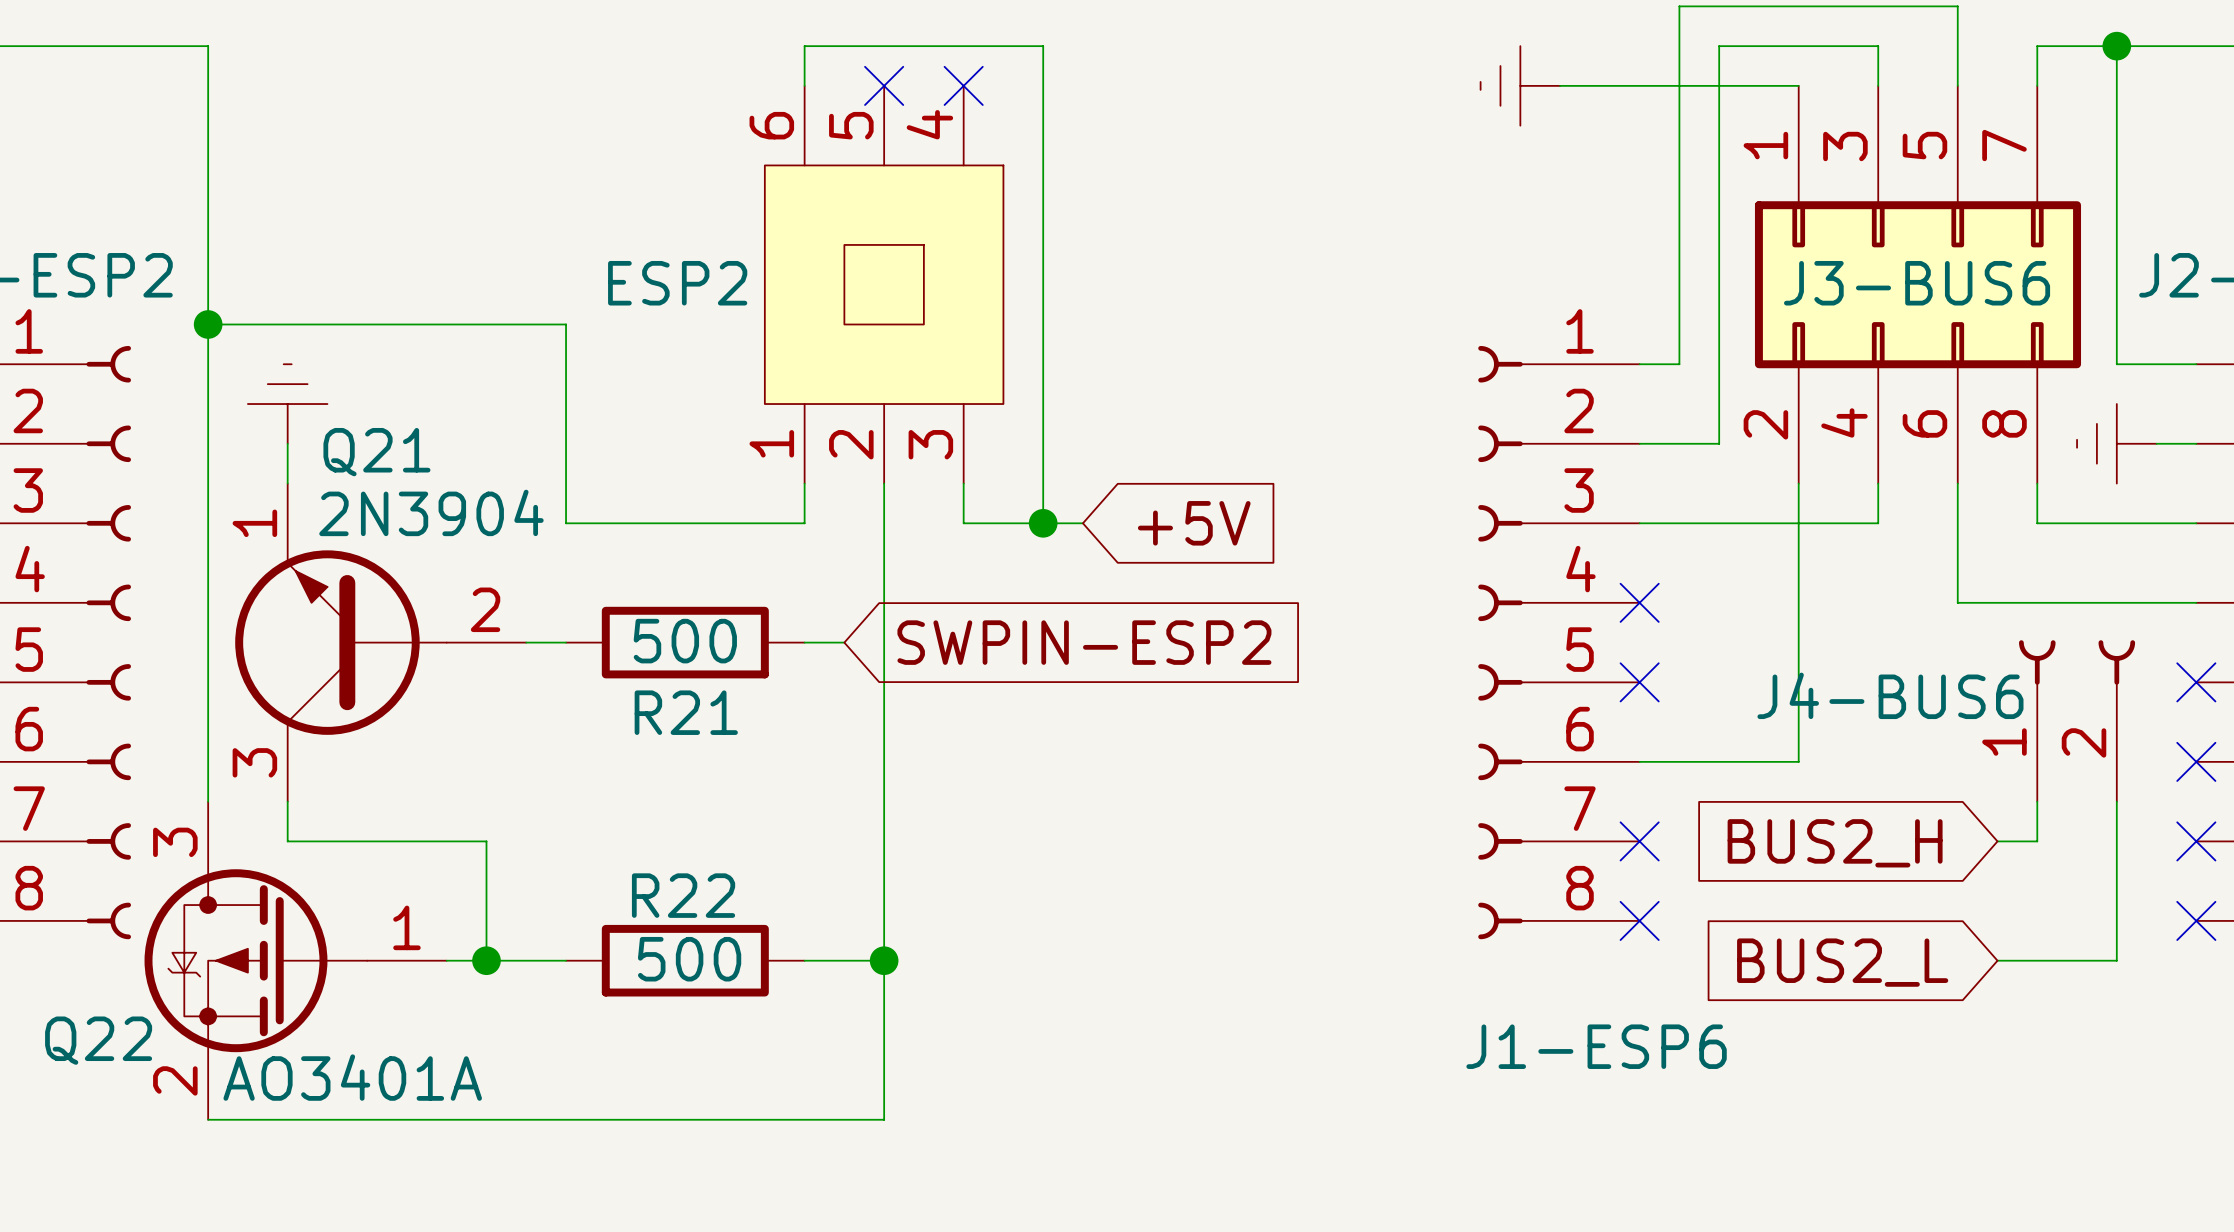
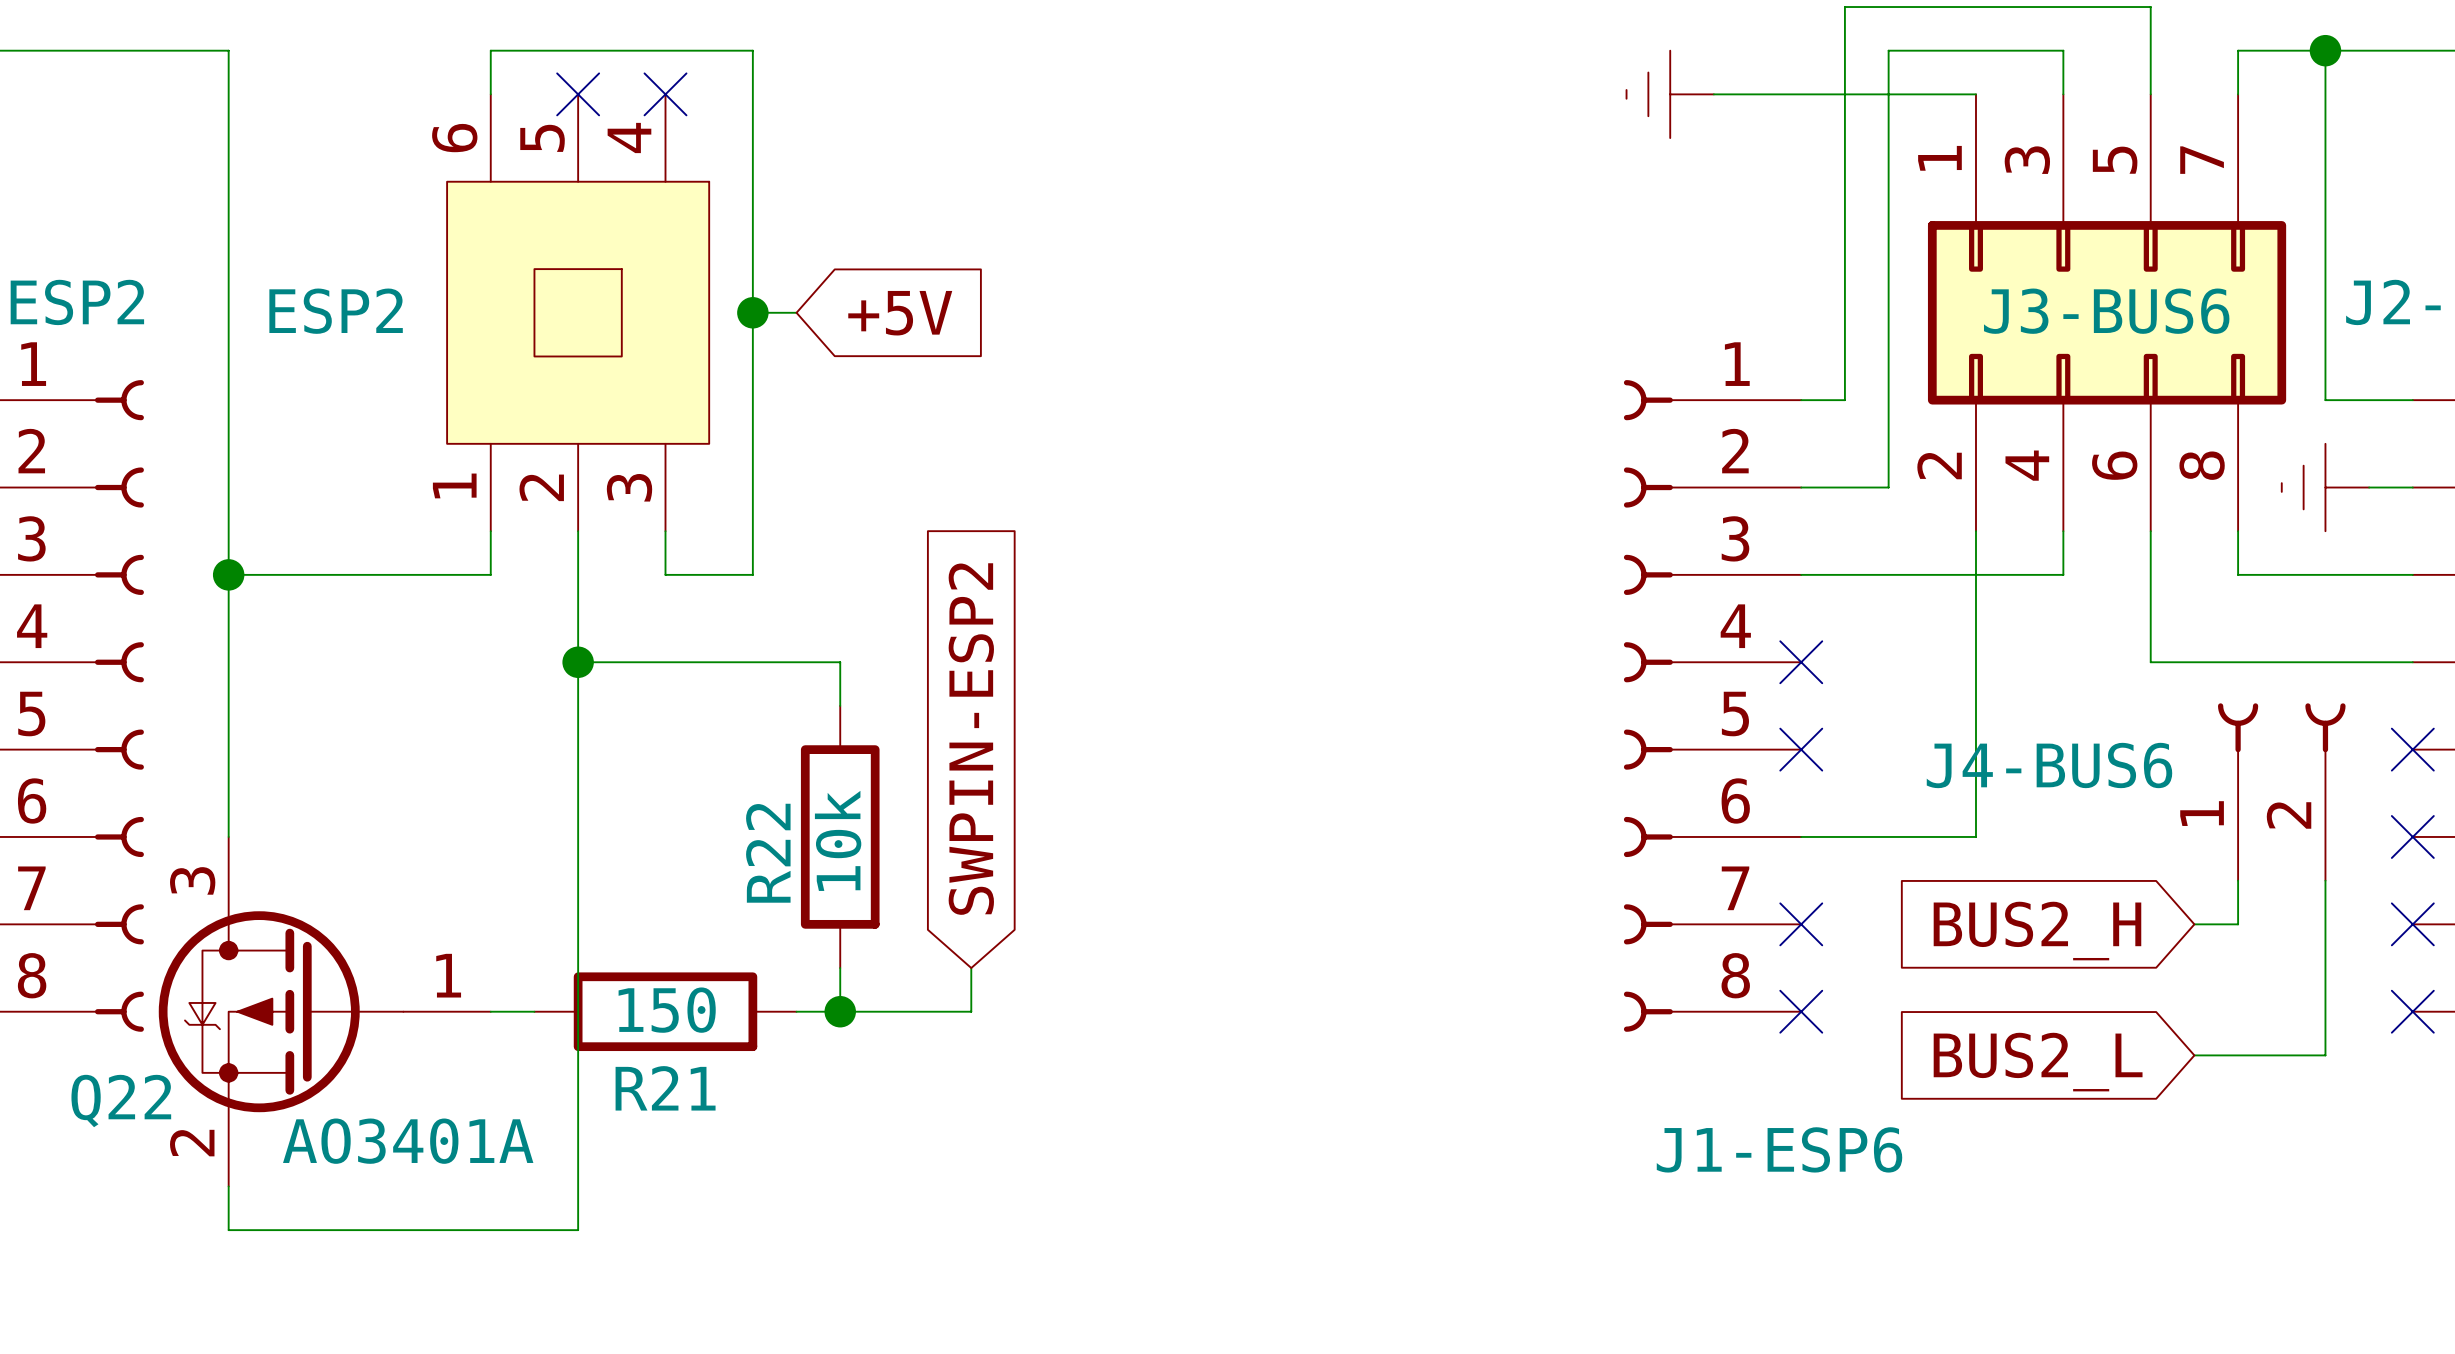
no-connect mark: none -> (578, 94)
no-connect mark: none -> (665, 94)
wire: (804, 85) (804, 46) (1043, 46) (1043, 523) -> none
no-connect mark: (884, 85) -> none
no-connect mark: (963, 85) -> none
junction: none -> (752, 312)
ESP2 position: (884, 284) -> (578, 312)
wire: (208, 324) (566, 324) (566, 523) (605, 523) -> (665, 531) (665, 574)
junction: (208, 324) -> none
power symbol: (287, 404) -> none
wire: (287, 443) (287, 483) -> (840, 968) (840, 1011)
wire: none -> (490, 531) (490, 574) (228, 574)
wire: none -> (578, 531) (578, 1230)
wire: (804, 483) (804, 523) (685, 523) -> (490, 94) (490, 50) (752, 50) (752, 574)
wire: (884, 483) (884, 881) -> none
wire: (963, 483) (963, 523) (1082, 523) -> none
junction: none -> (228, 574)
junction: (1043, 523) -> none
global label position: +5V (1194, 523) -> +5V (900, 313)
wire: none -> (578, 662) (840, 662) (840, 705)
junction: none -> (578, 662)
R21 value: 500 (685, 641) -> 150 (667, 1010)
Q21: 2N3904 (380, 642) -> none
wire: (526, 642) (566, 642) -> (490, 1011) (534, 1011)
R21 position: (685, 642) -> (665, 1011)
wire: (804, 642) (844, 642) -> (752, 312) (796, 312)
global label rotation: 0° (1084, 642) -> 90° counterclockwise (971, 739)
wire: (287, 801) (287, 841) (486, 841) (486, 960) -> none
R22 name position: R22 (683, 895) -> R22 (768, 853)
wire: (884, 920) (884, 1119) (526, 1119) -> (971, 1011) (796, 1011)
R22 value: 500 (689, 959) -> 10k (838, 840)
Q22 position: (295, 960) -> (324, 1011)
wire: (446, 960) (566, 960) -> none
junction: (486, 960) -> none
R22 rotation: 0° (685, 960) -> 90° clockwise (840, 836)
R22 position: (685, 960) -> (840, 836)
wire: (804, 960) (884, 960) -> none
junction position: (884, 960) -> (840, 1011)

